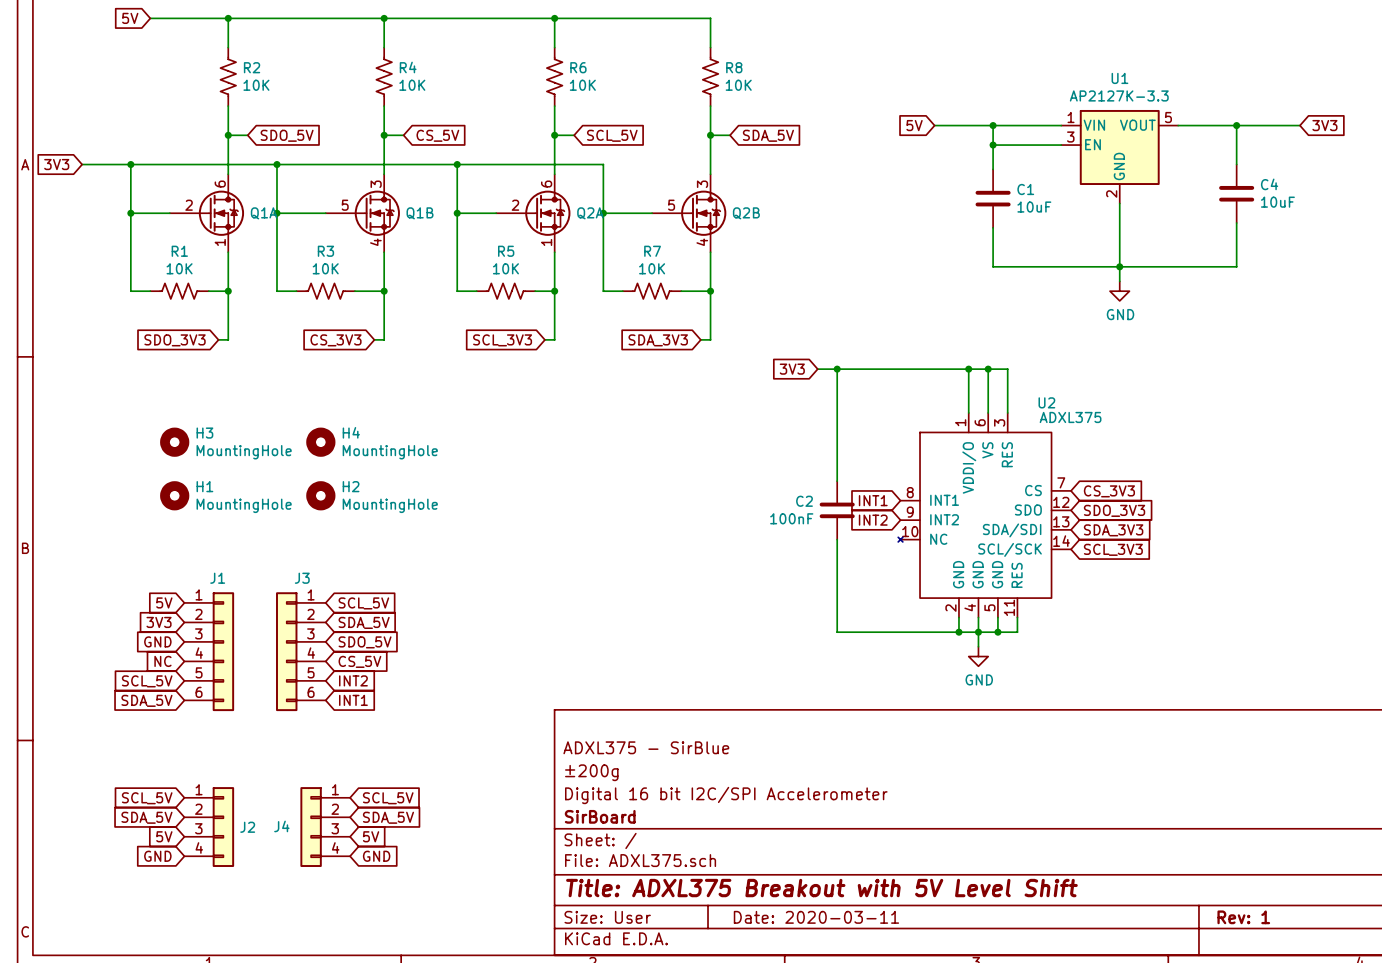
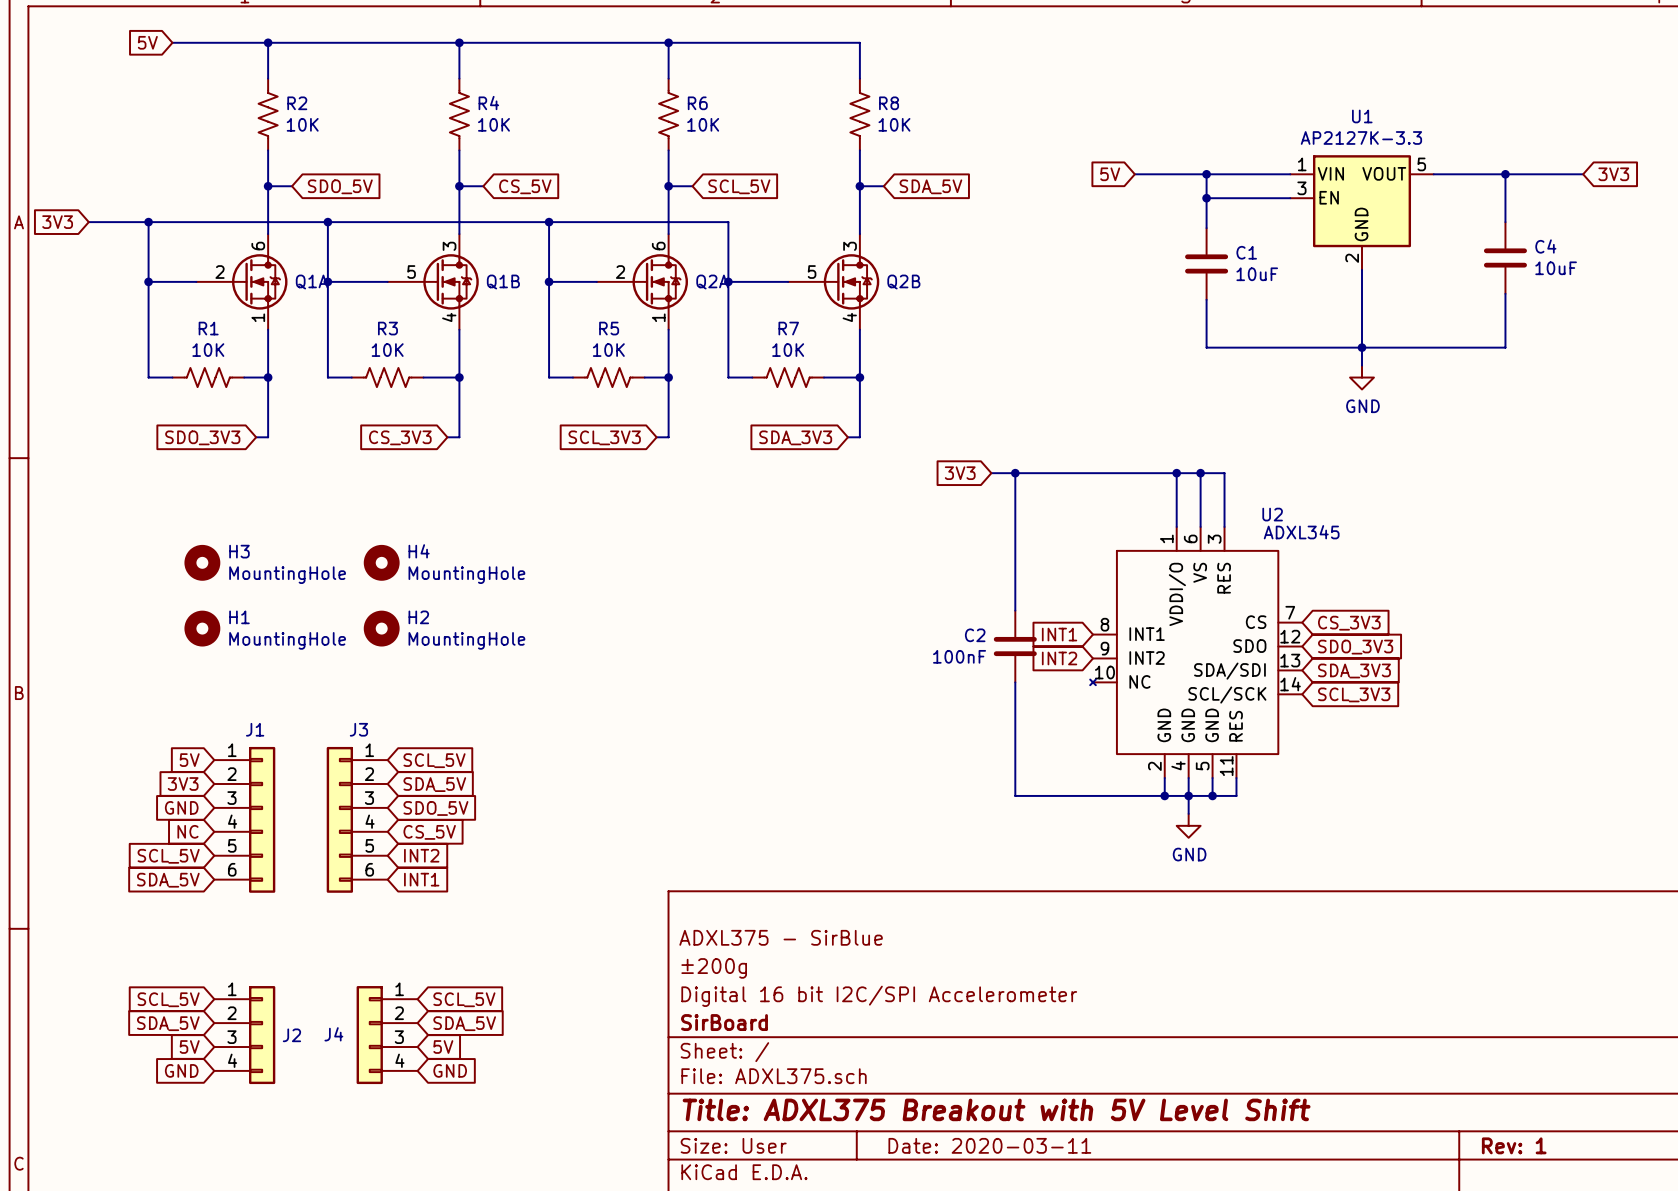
U2 value: ADXL375 (1070, 417) -> ADXL345 (1301, 532)

